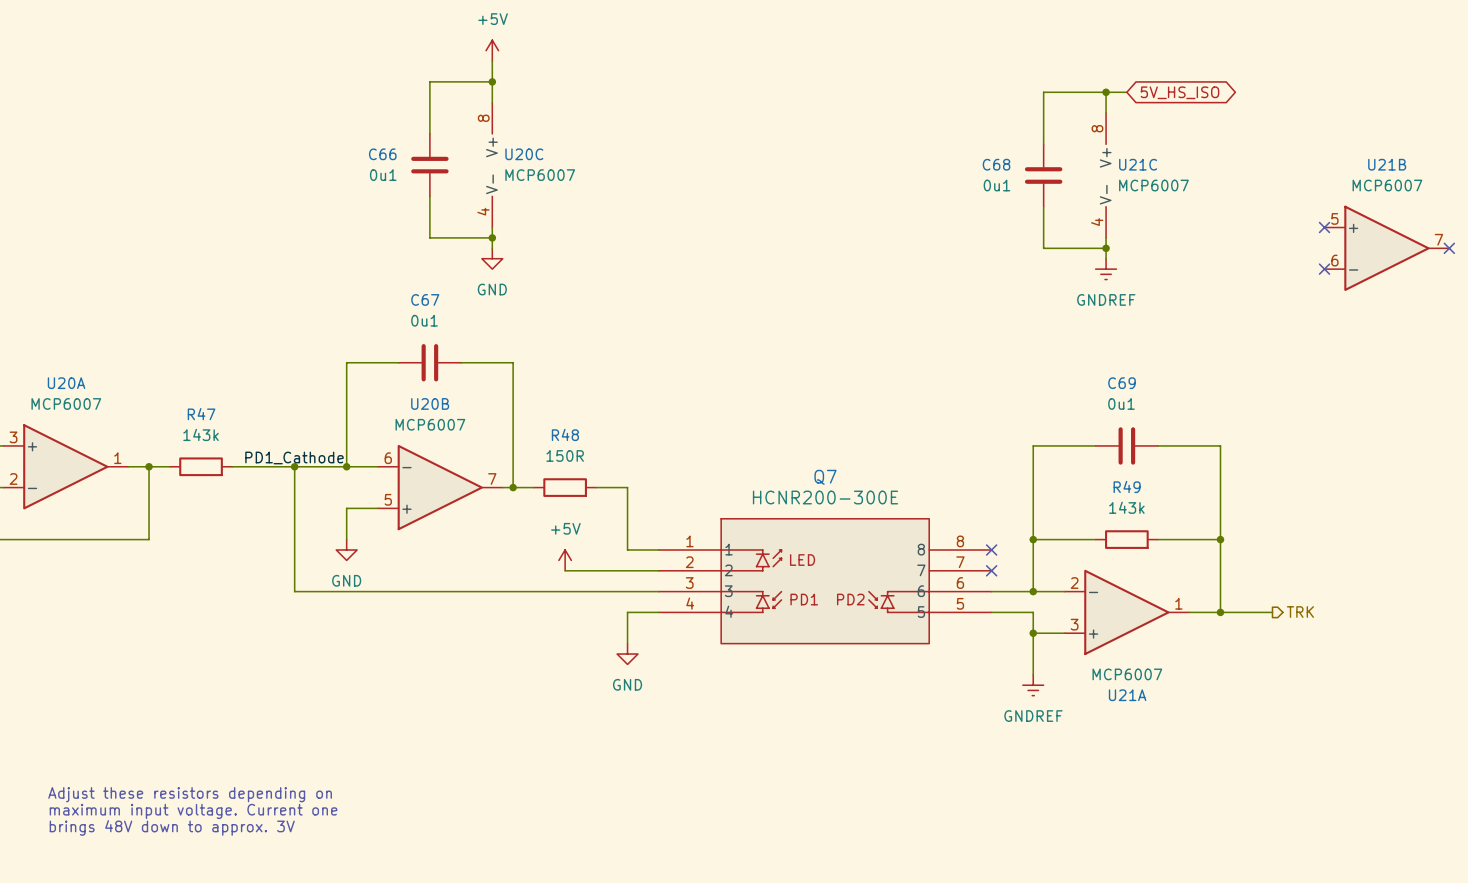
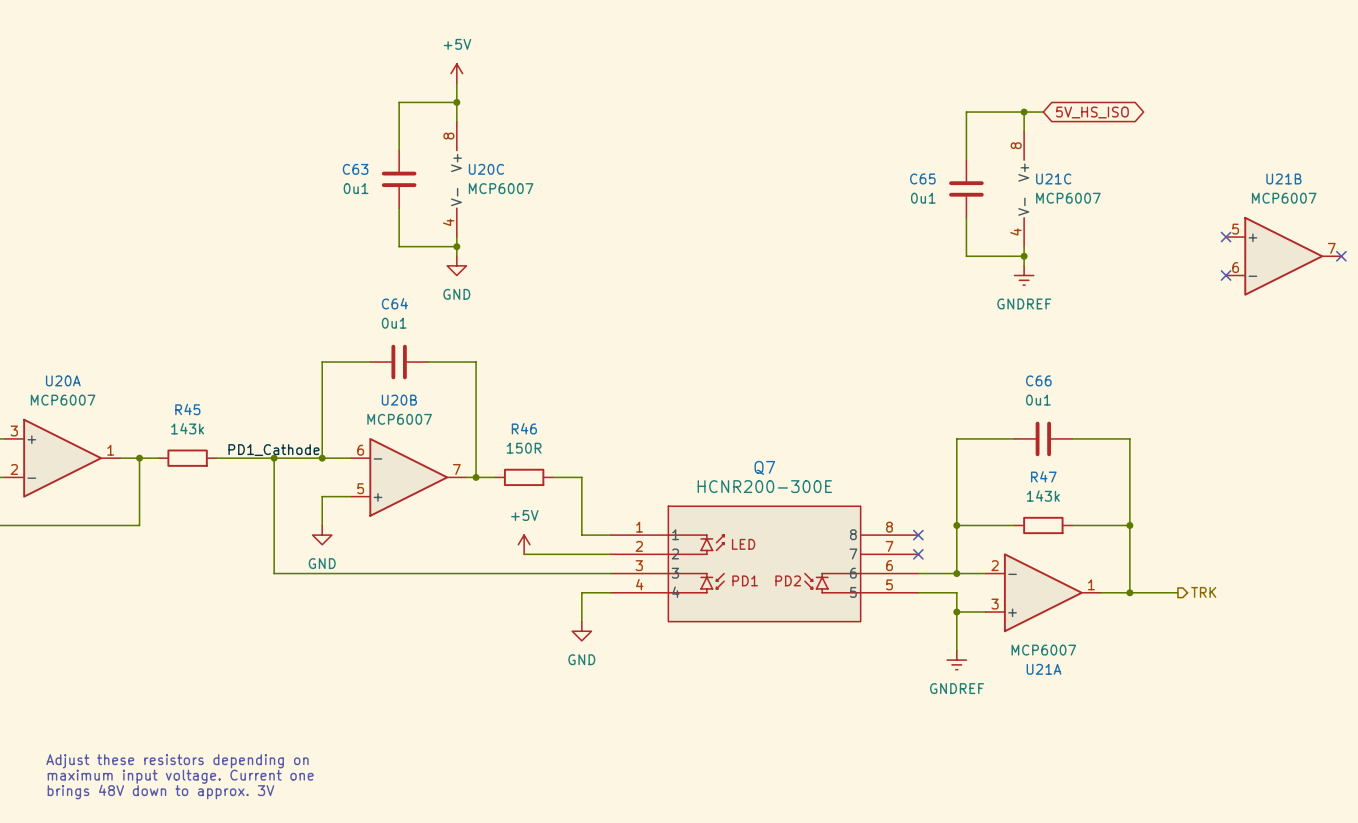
C66 name: C66 (382, 154) -> C63 (355, 169)
C68 name: C68 (996, 164) -> C65 (922, 178)
C67 name: C67 (425, 299) -> C64 (394, 303)
C69 name: C69 (1121, 383) -> C66 (1038, 380)
R47 name: R47 (201, 414) -> R45 (187, 409)
R48 name: R48 (565, 434) -> R46 (524, 428)
R49 name: R49 (1127, 486) -> R47 (1043, 476)

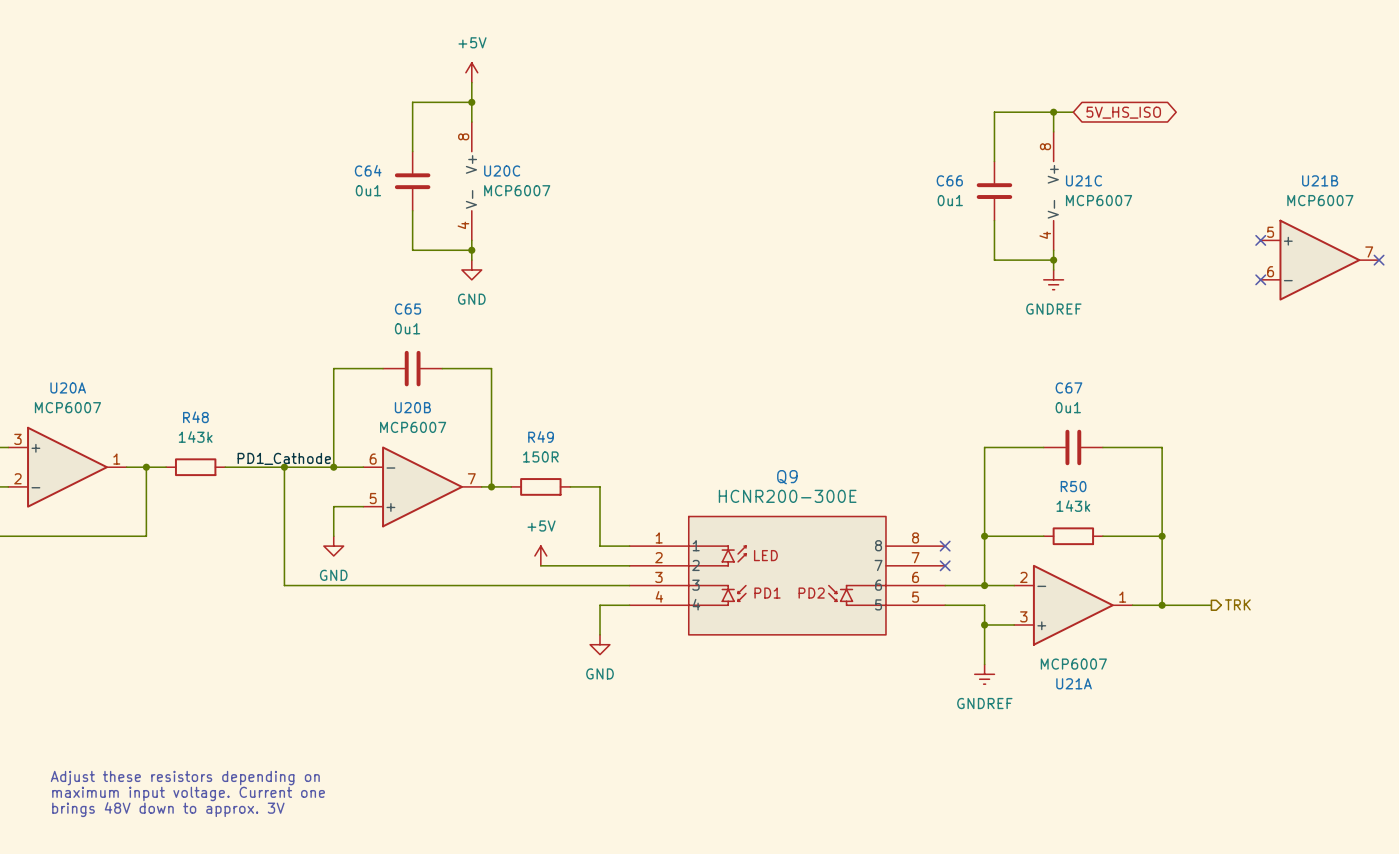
C63 name: C63 (355, 169) -> C64 (368, 170)
C65 name: C65 (922, 178) -> C66 (949, 180)
C64 name: C64 (394, 303) -> C65 (408, 309)
C66 name: C66 (1038, 380) -> C67 (1068, 387)
R45 name: R45 (187, 409) -> R48 (195, 417)
R46 name: R46 (524, 428) -> R49 (541, 437)
Q7 name: Q7 (764, 467) -> Q9 (787, 477)
R47 name: R47 (1043, 476) -> R50 (1073, 486)

